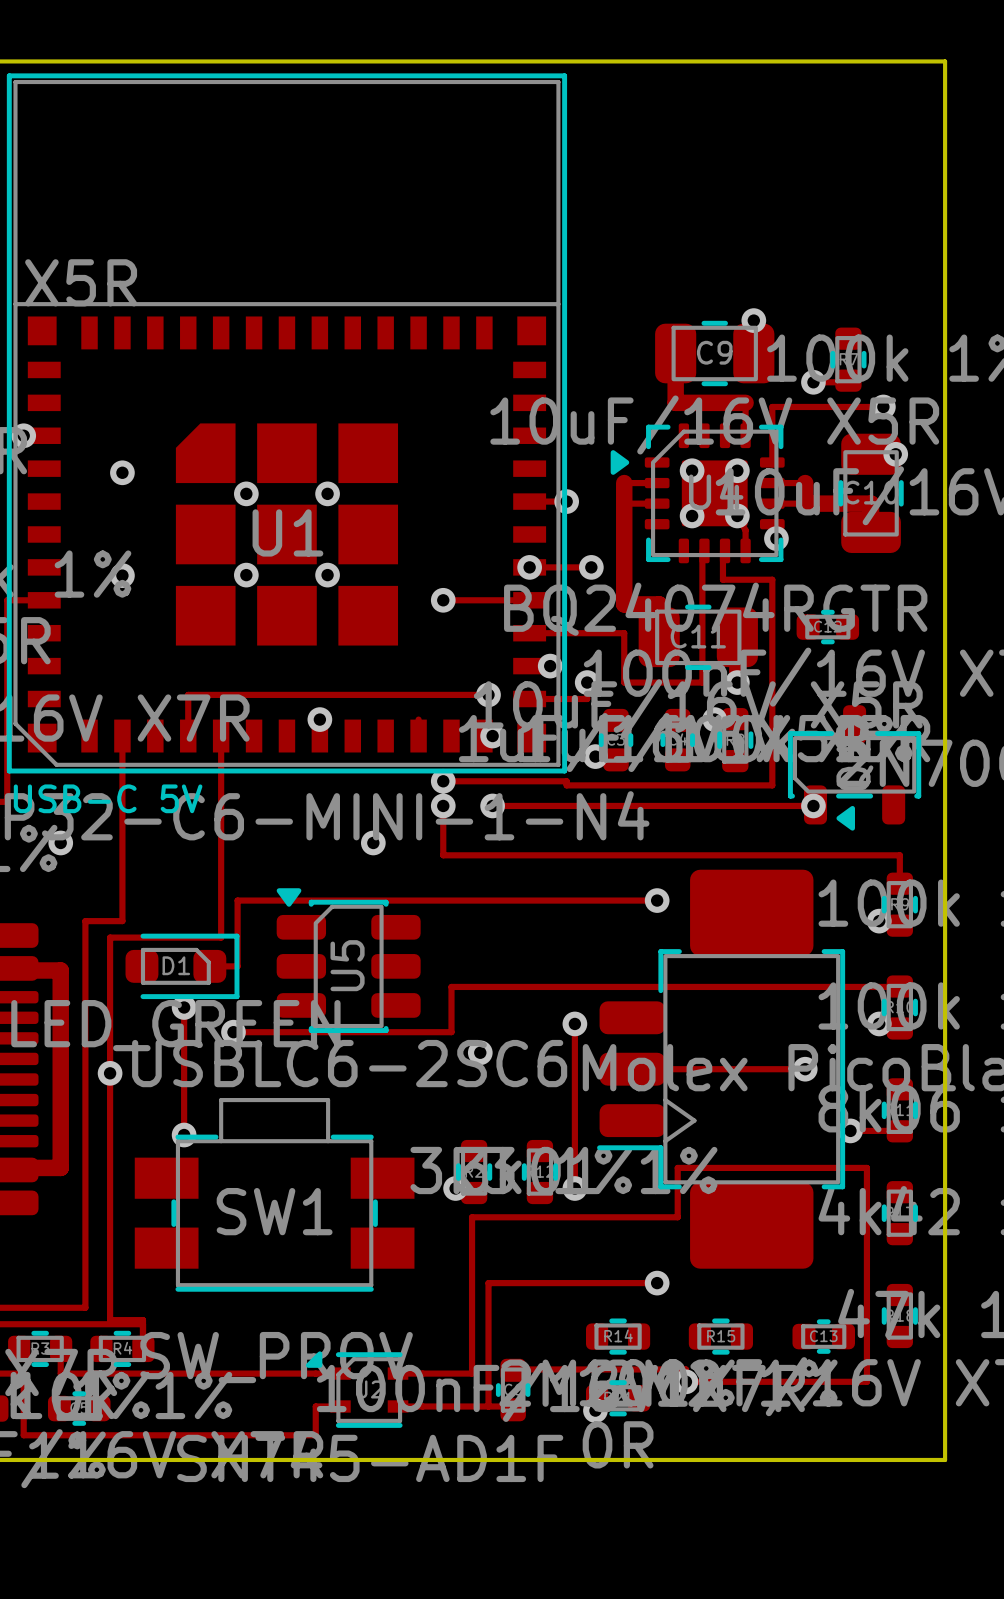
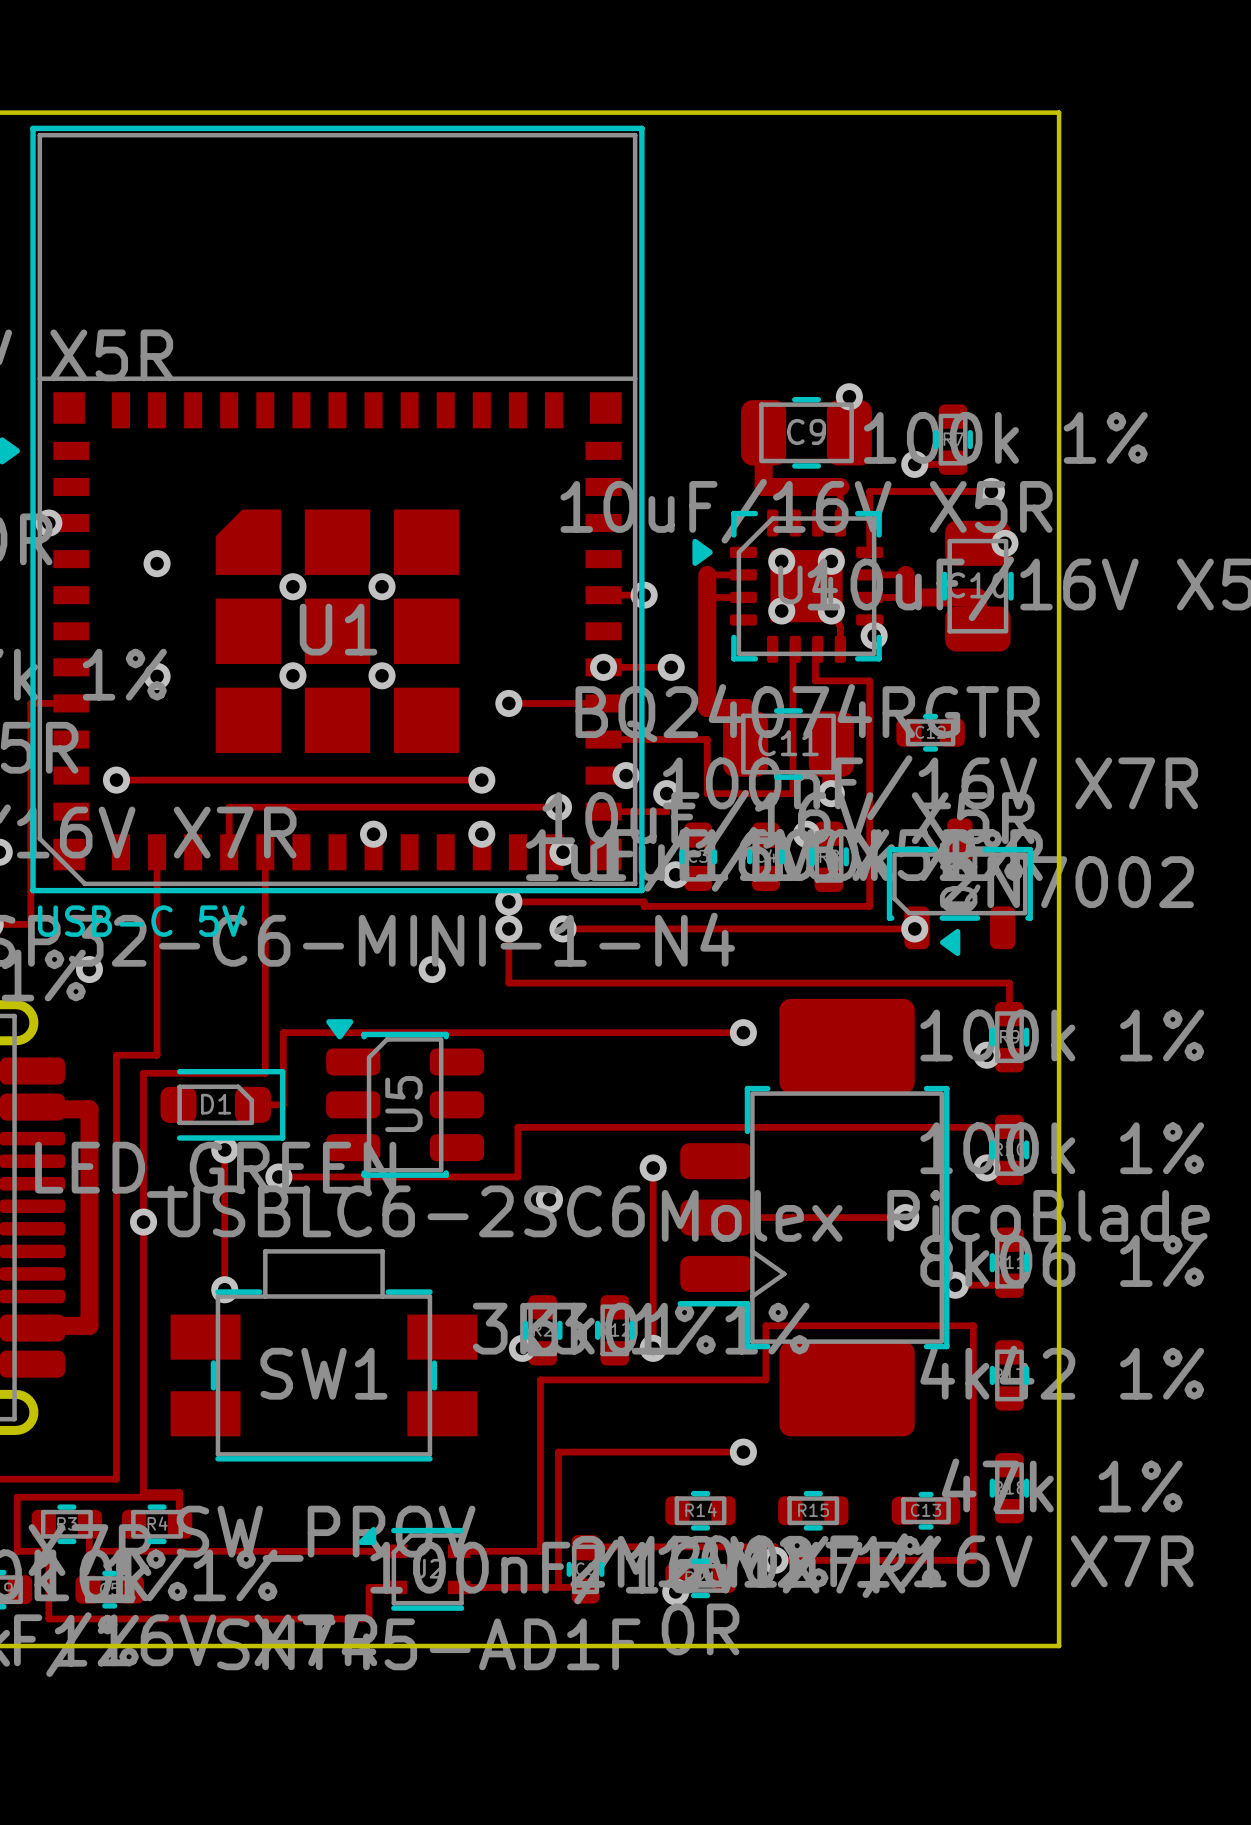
track: none -> (116, 780) (481, 780)
via: none -> (116, 780)
via: none -> (481, 780)
via: none -> (481, 834)

